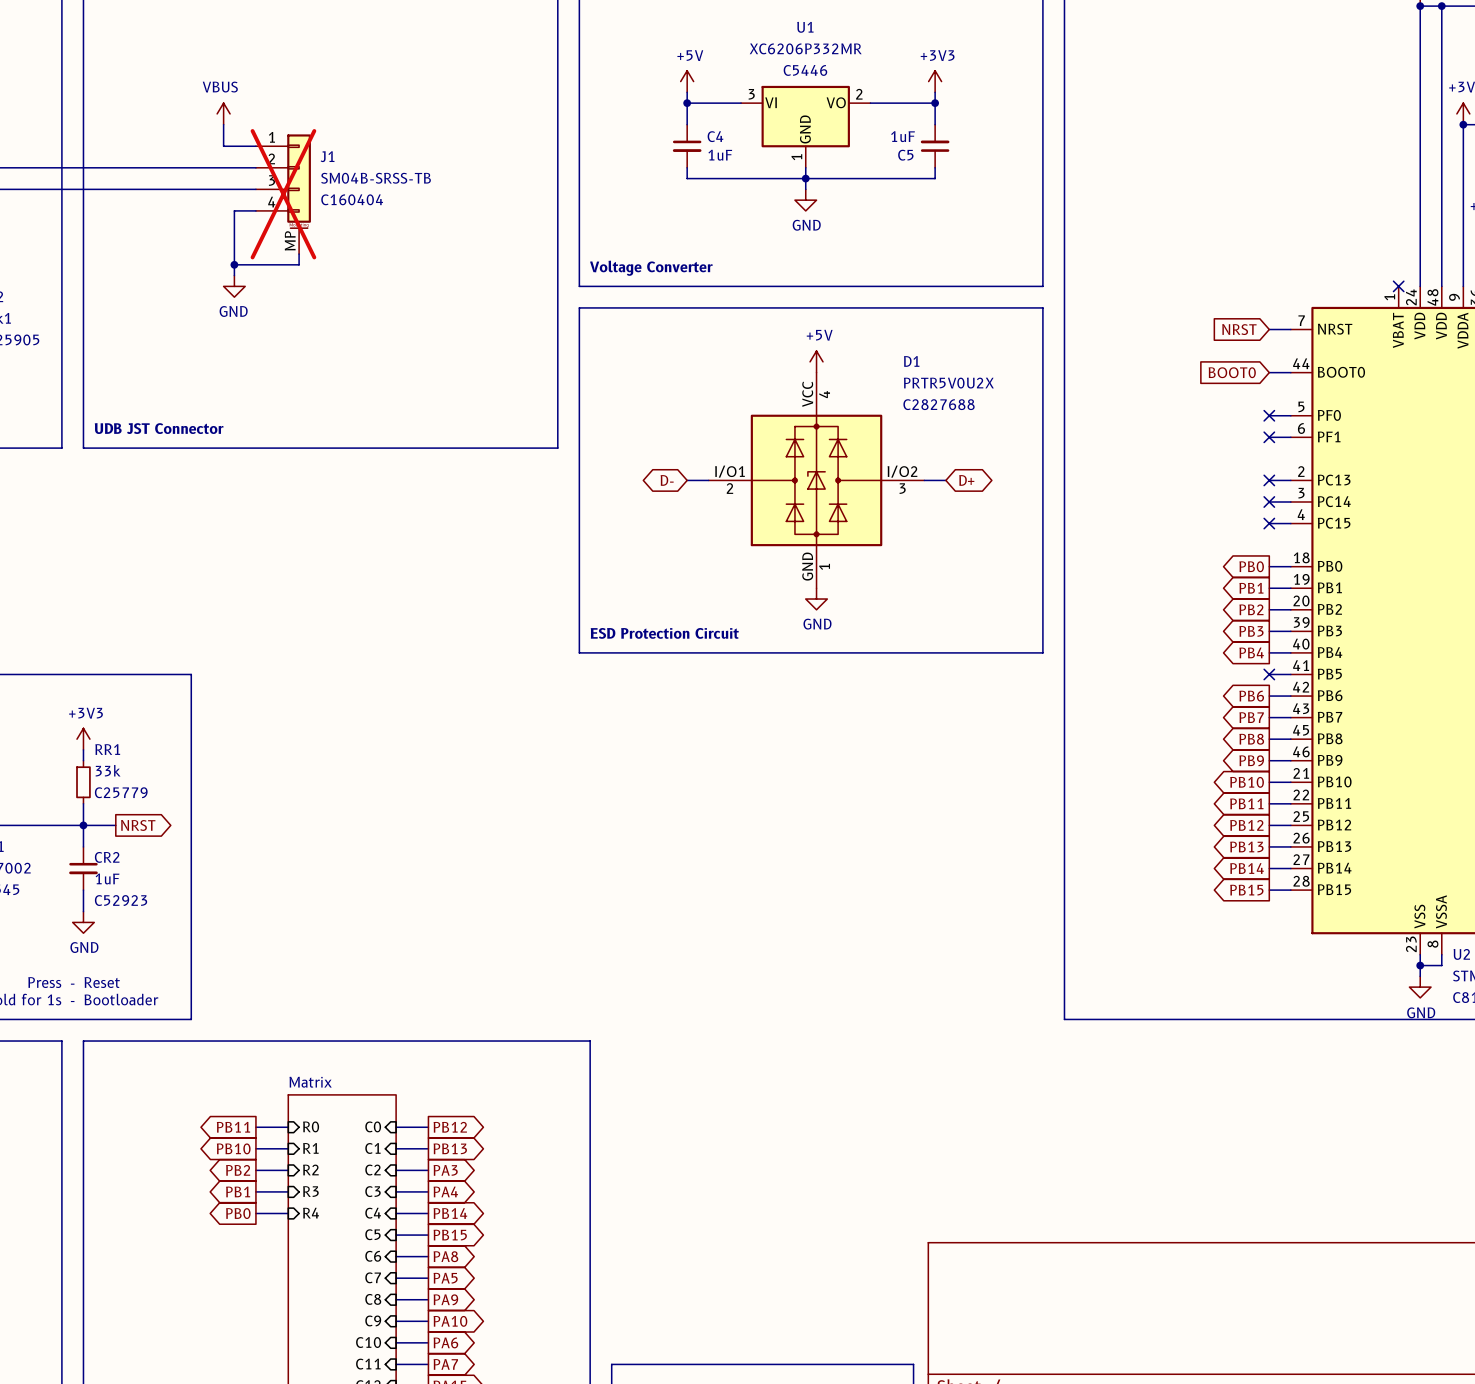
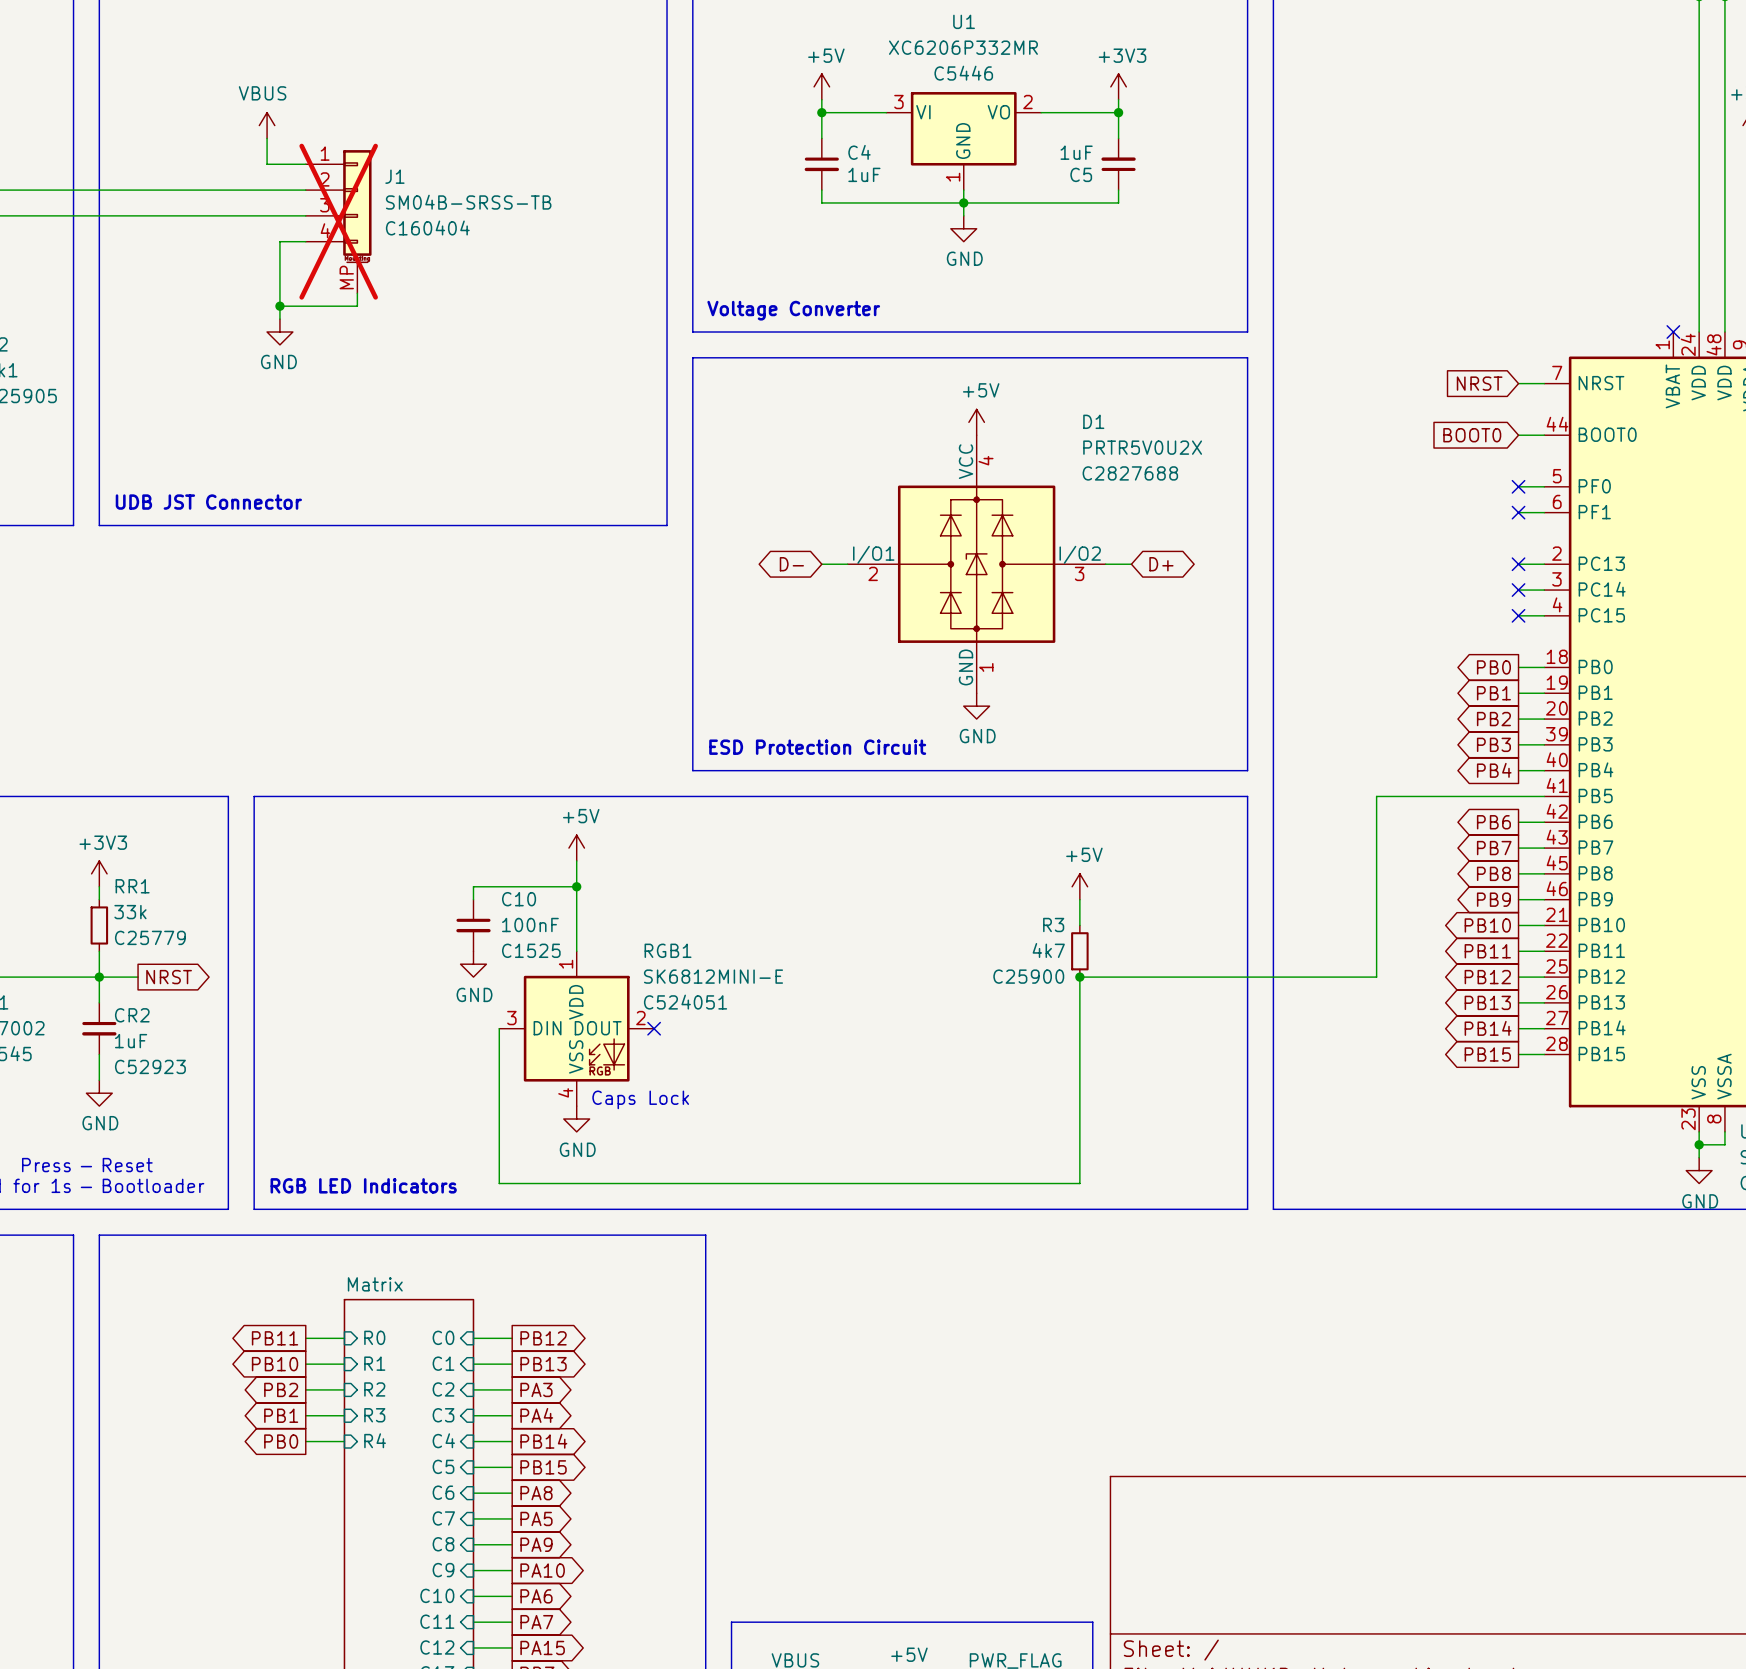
line: none -> (254, 796) (1247, 796) (1247, 1209) (254, 1209) (254, 796)
wire: none -> (1518, 796) (1376, 796) (1376, 977) (1079, 977) (1079, 1183) (499, 1183) (499, 1028)
no-connect mark: (1269, 674) -> none
power symbol: none -> +5V (576, 848)
wire: none -> (576, 860) (576, 951)
wire: none -> (576, 886) (473, 886) (473, 899)
junction: none -> (576, 886)
power symbol: none -> +5V (1079, 886)
wire: none -> (1079, 899) (1079, 925)
C10: none -> 100nF (473, 925)
R3: none -> 4k7 (1079, 951)
power symbol: none -> GND (473, 964)
junction: none -> (1079, 977)
RGB1: none -> SK6812MINI-E (576, 1028)
no-connect mark: none -> (654, 1028)
text: none -> Caps Lock (640, 1099)
power symbol: none -> GND (576, 1119)
text: none -> RGB LED Indicators (363, 1185)

